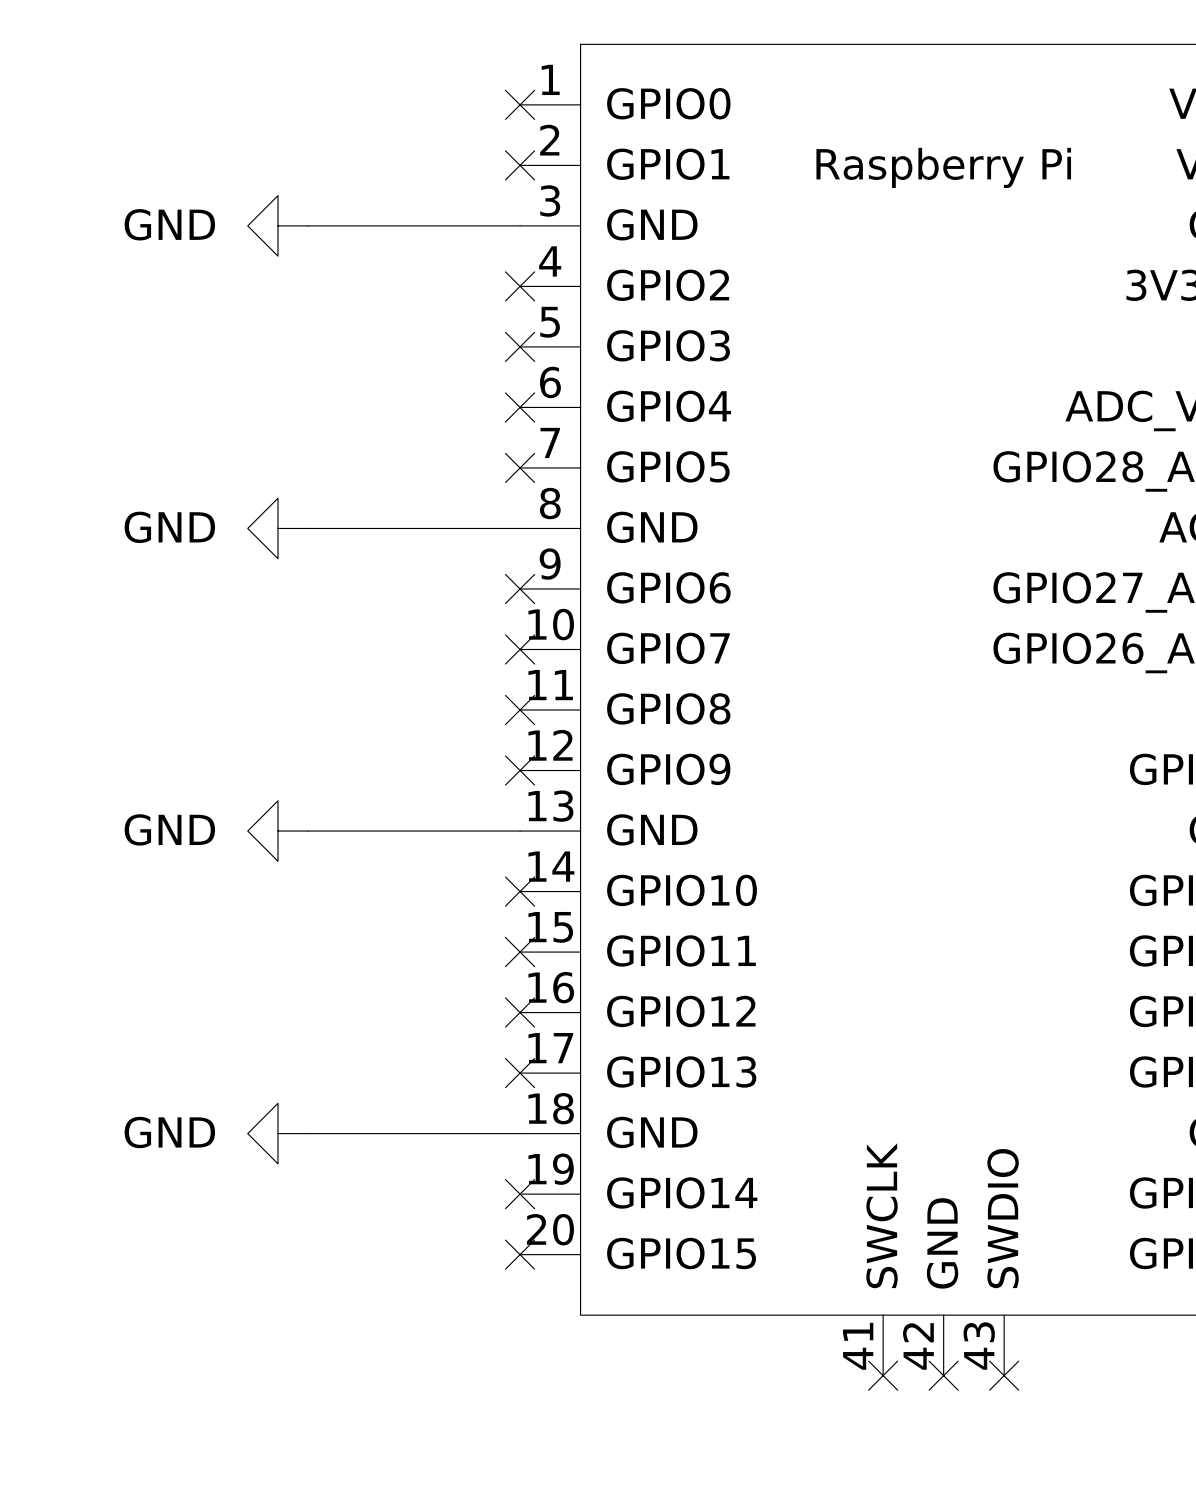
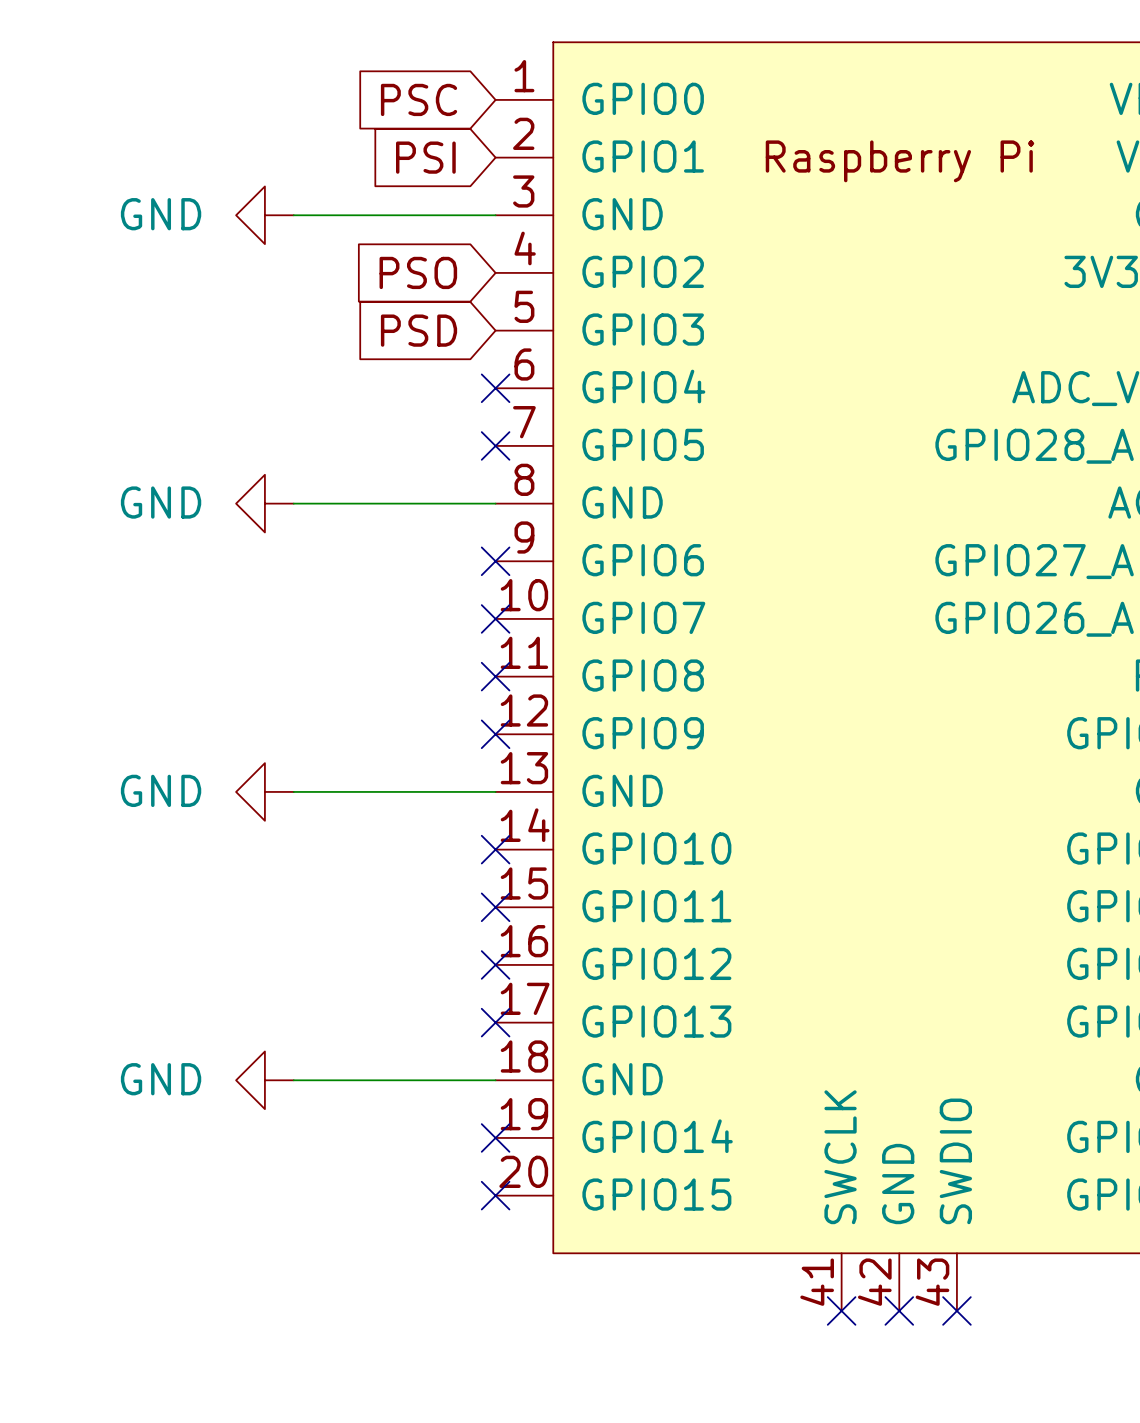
global label: none -> PSC (419, 99)
no-connect mark: (520, 104) -> none
global label: none -> PSI (425, 157)
no-connect mark: (520, 165) -> none
global label: none -> PSO (418, 272)
no-connect mark: (520, 286) -> none
global label: none -> PSD (419, 330)
no-connect mark: (520, 346) -> none

